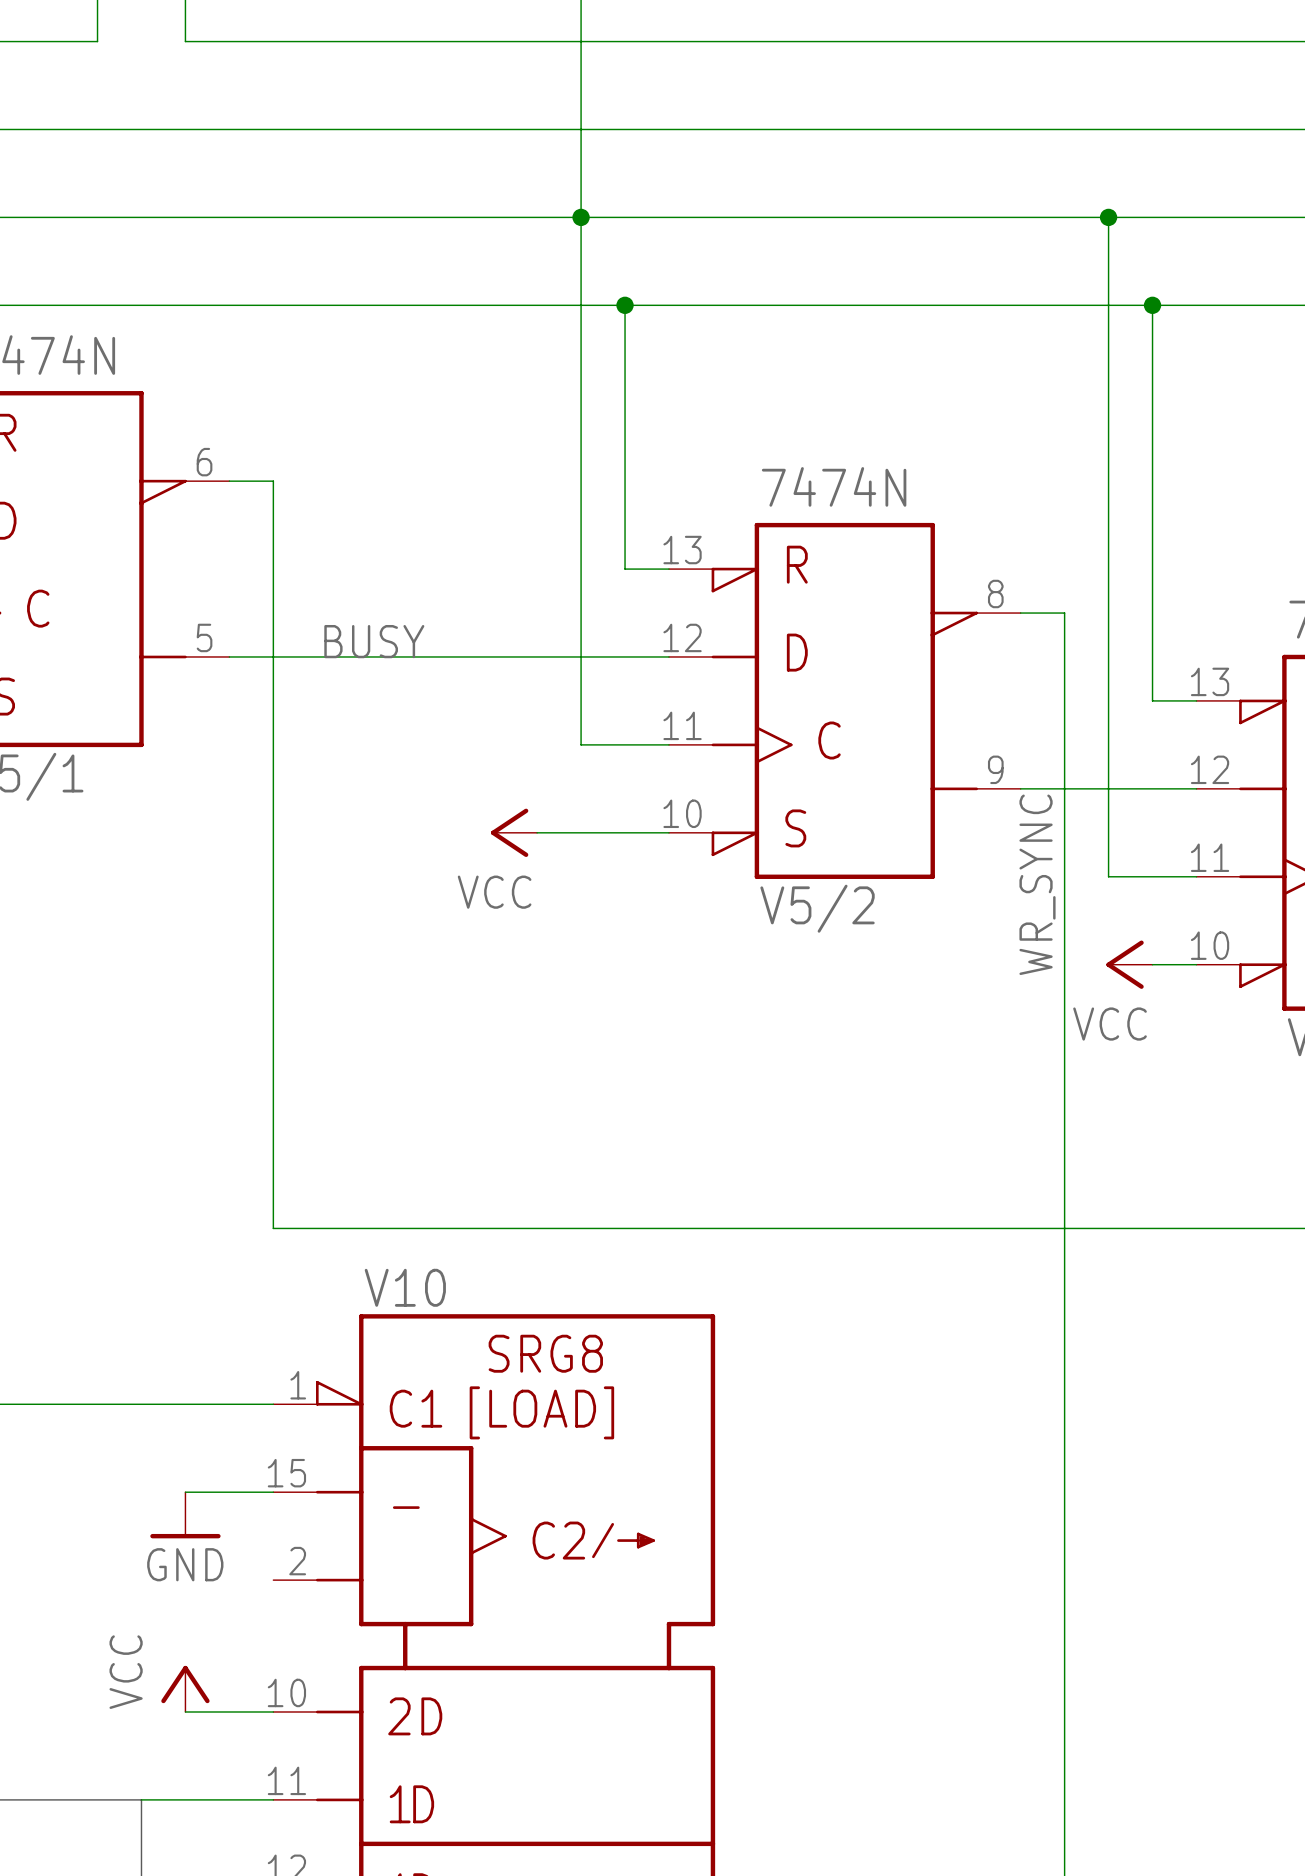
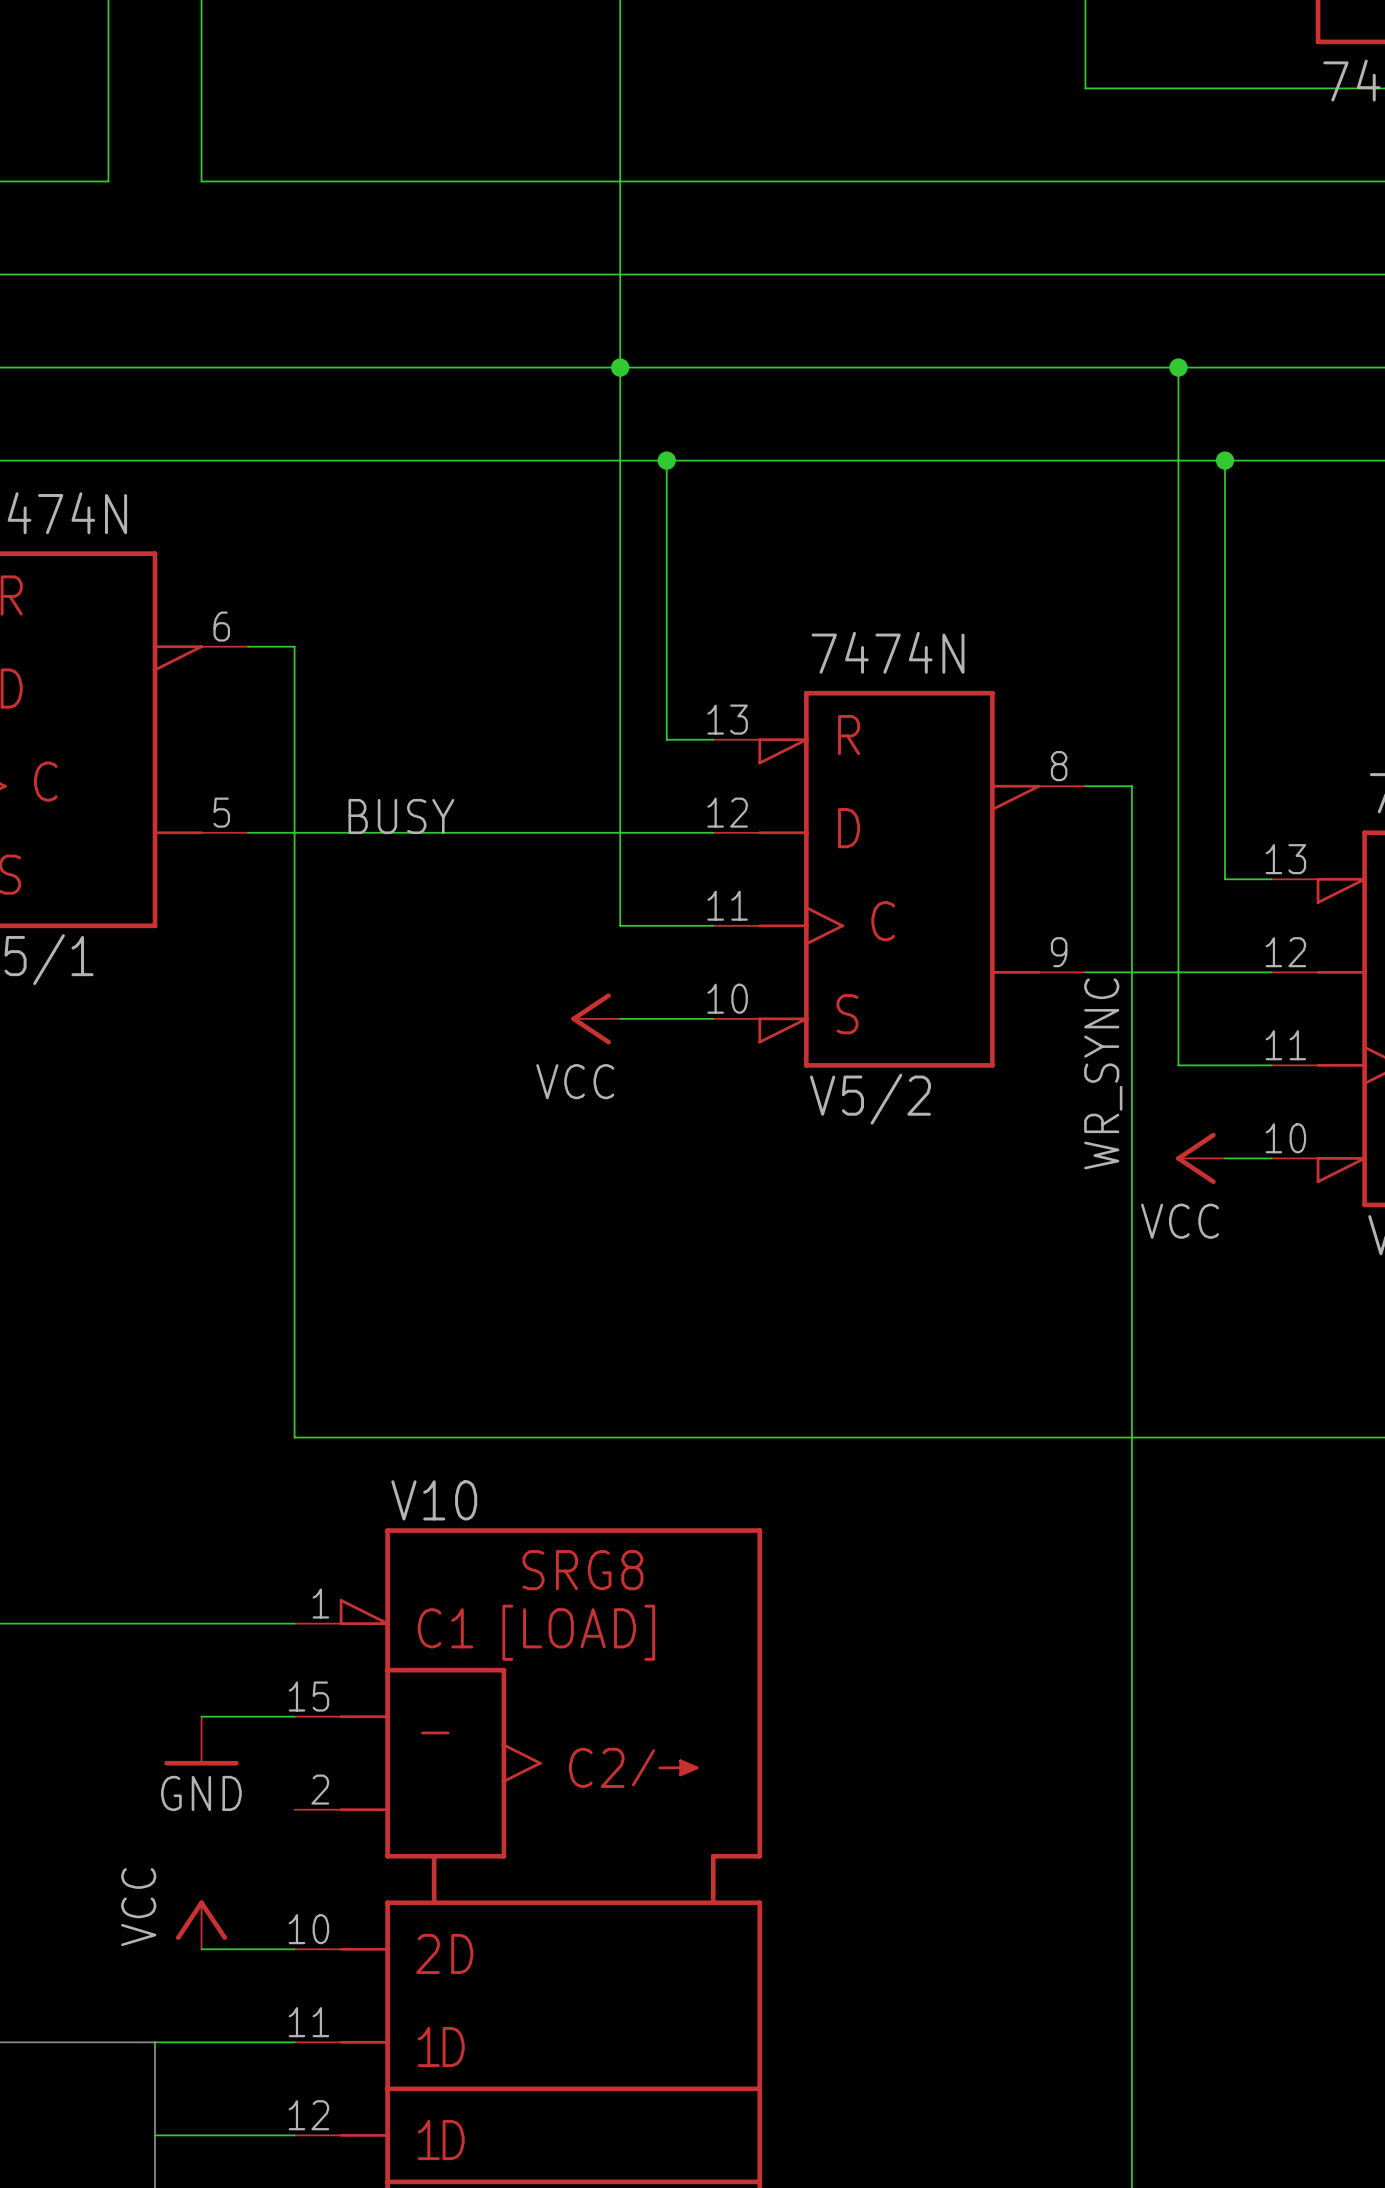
power symbol position: VCC (514, 832) -> VCC (595, 1018)

